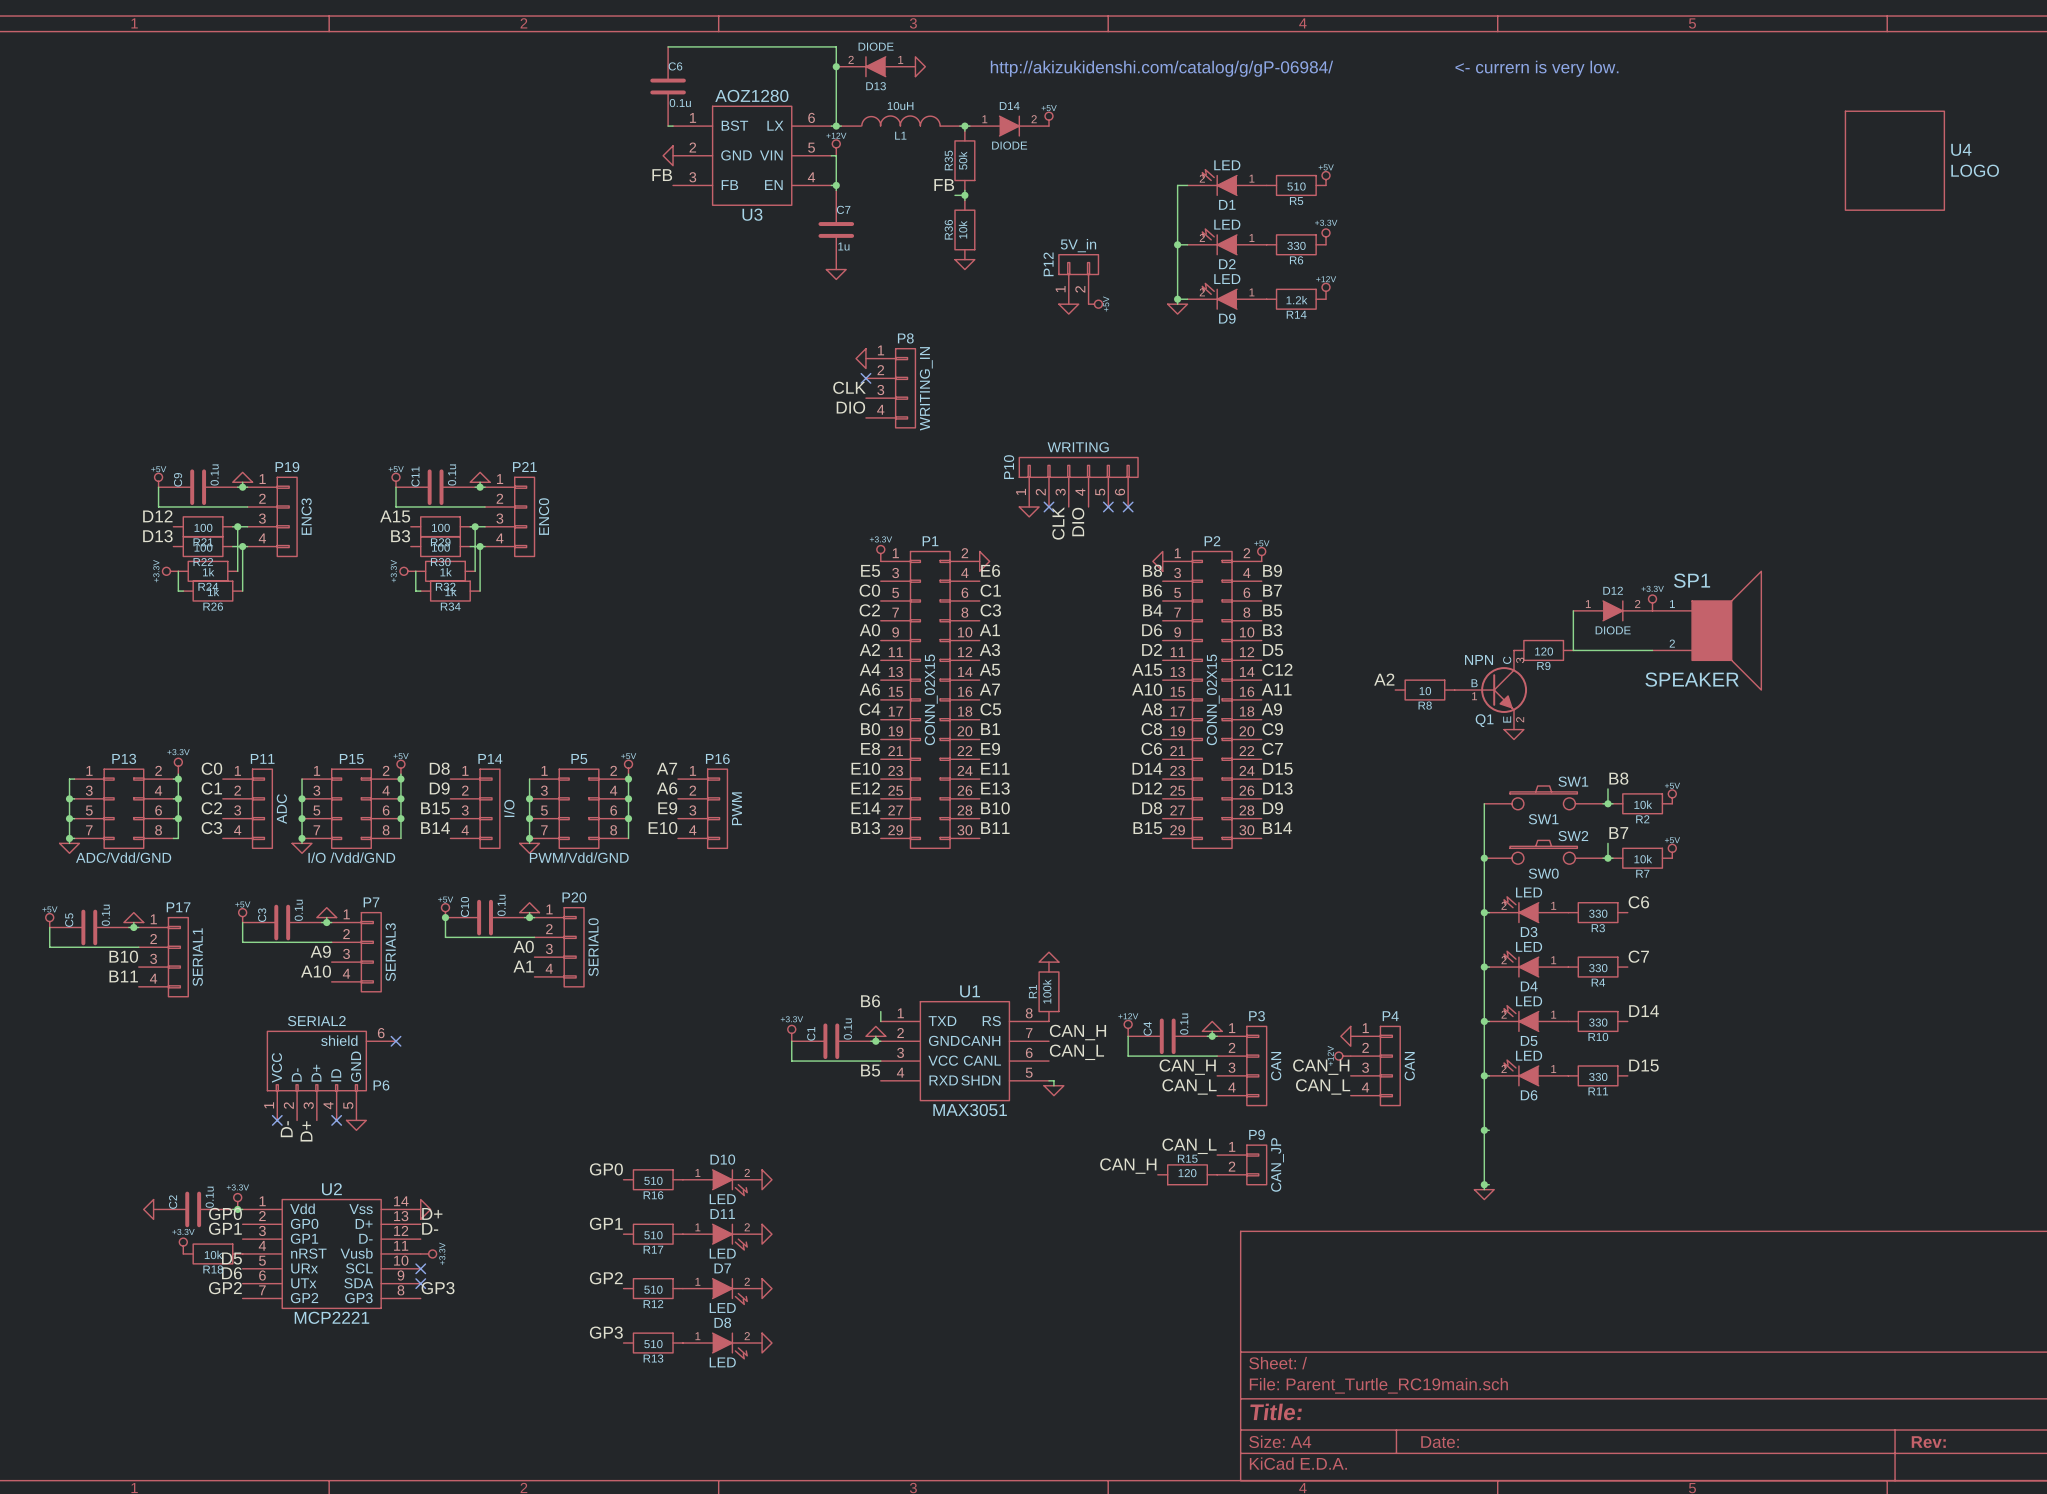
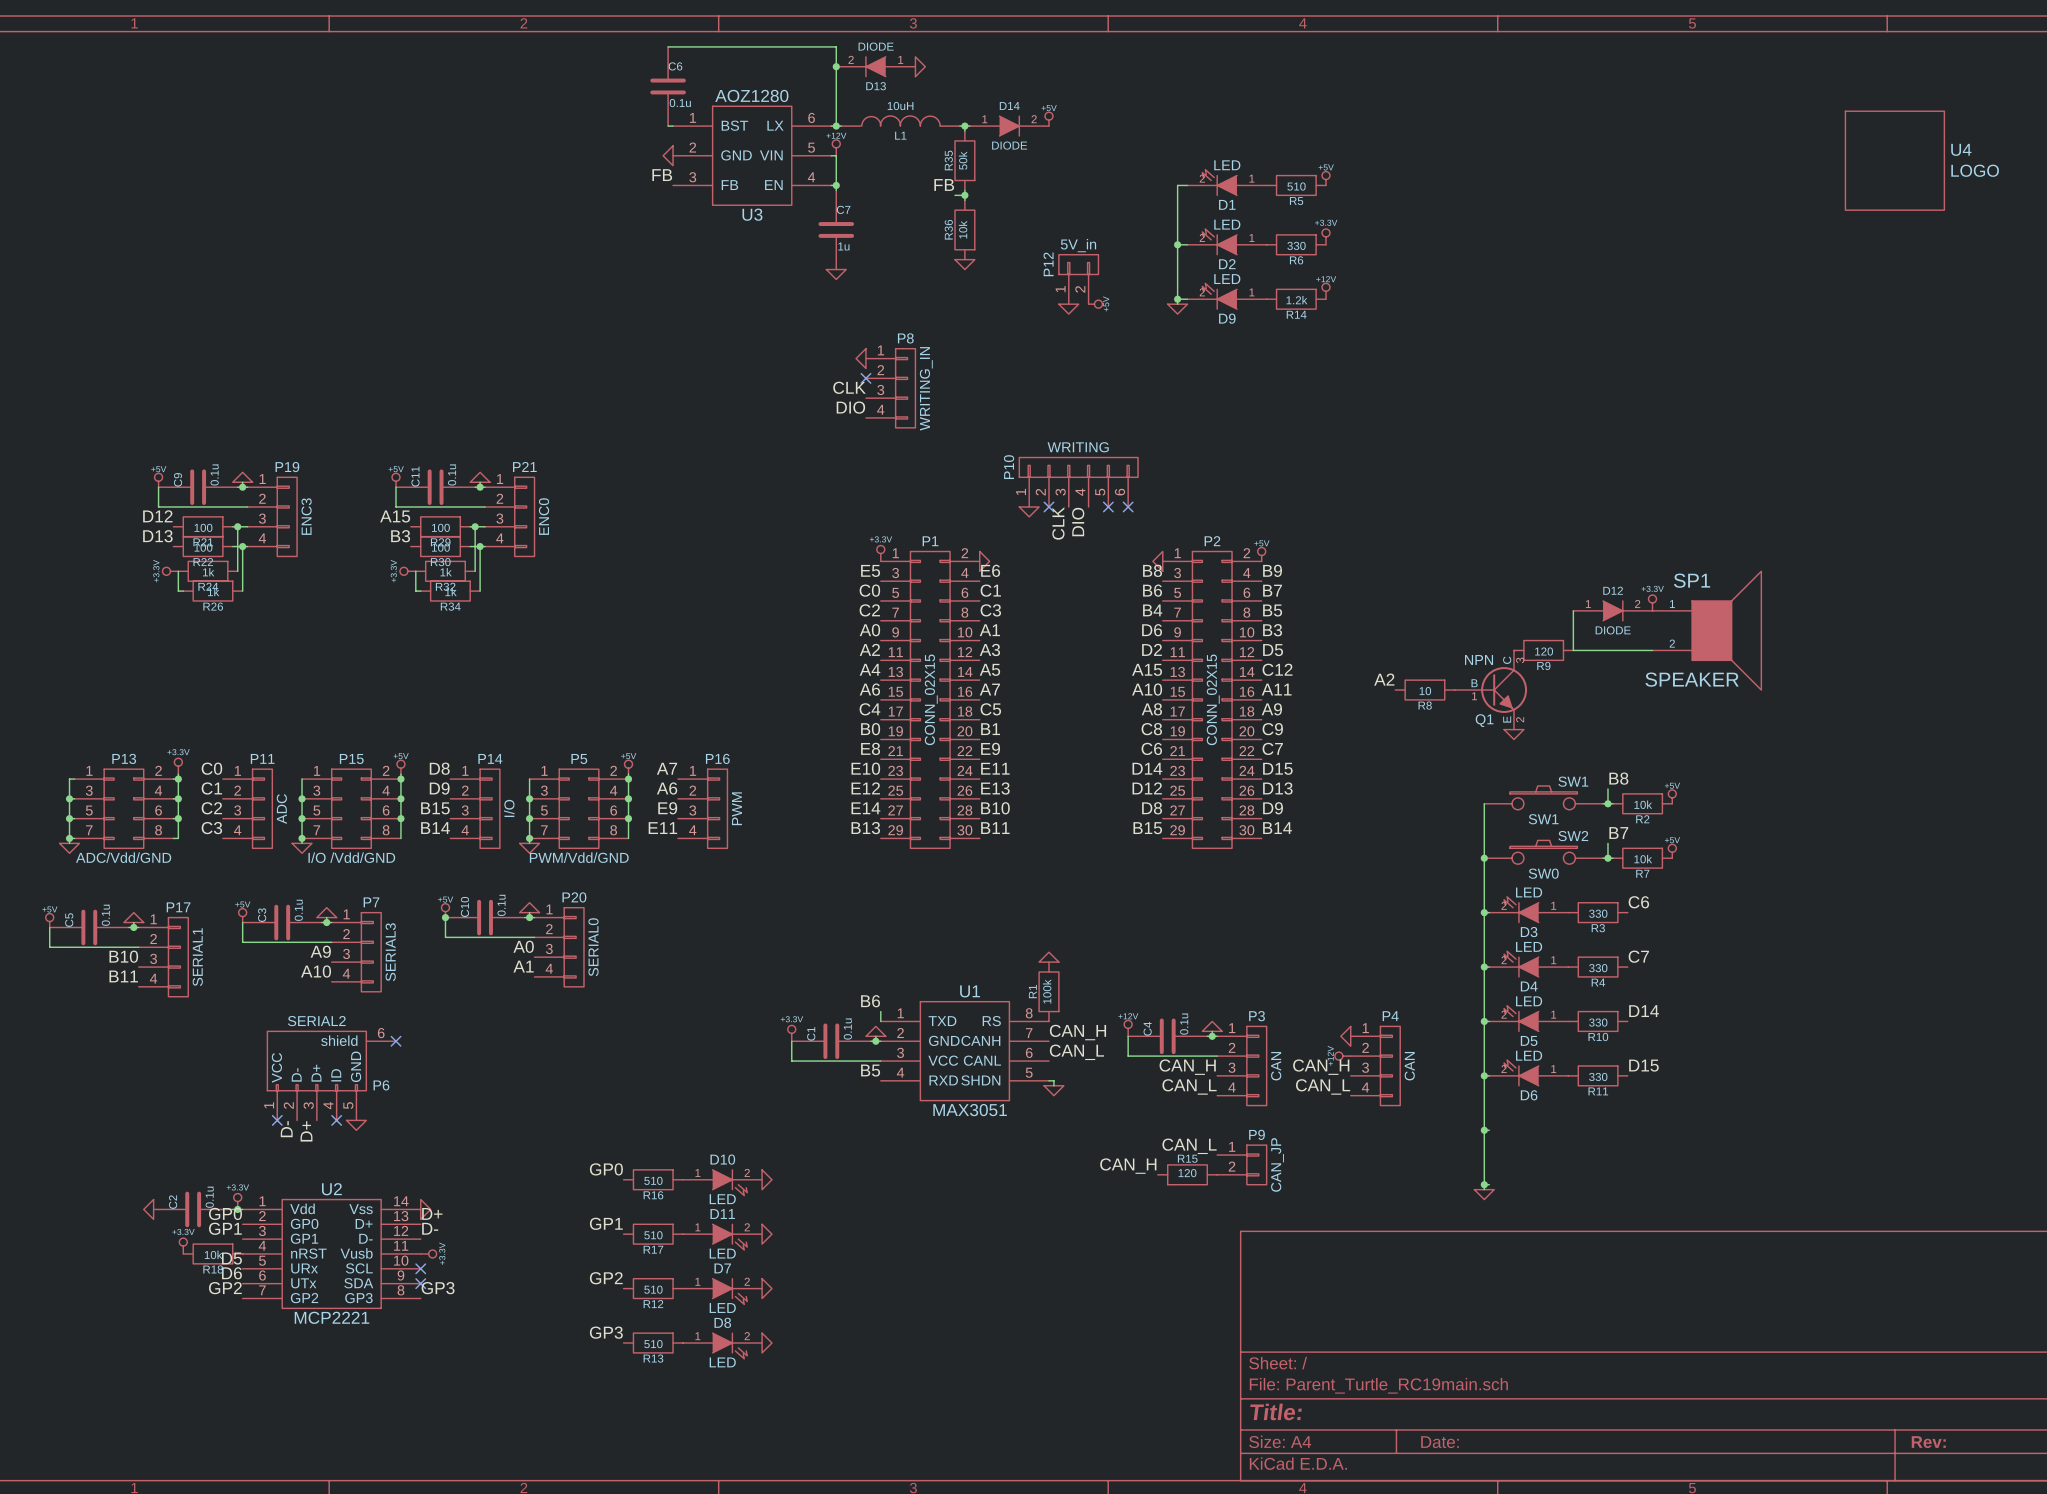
text: http://akizukidenshi.com/catalog/g/gP-06984/ (1161, 68) -> none
text: <- currern is very low. (1536, 68) -> none
label: E10 (662, 828) -> E11 (662, 828)

